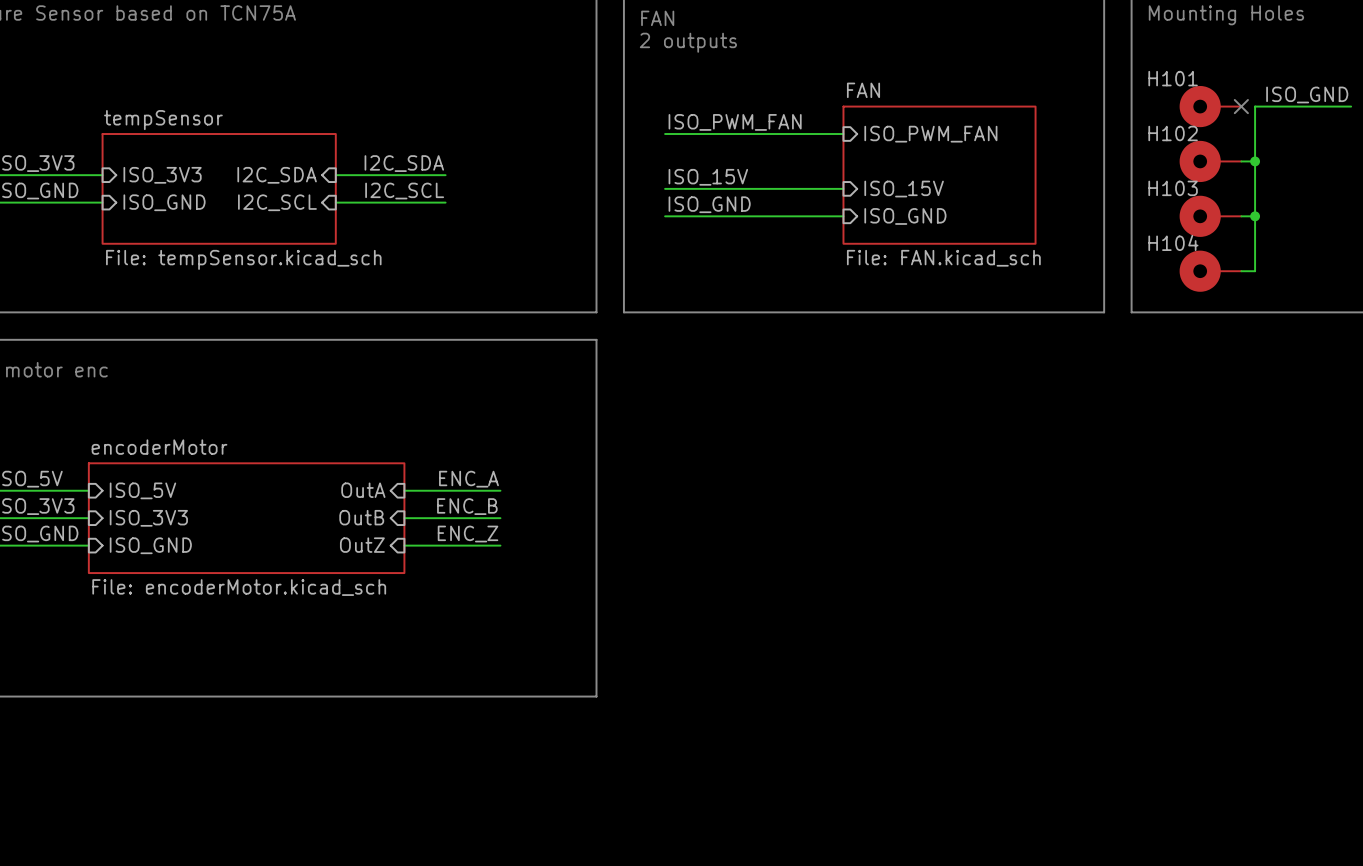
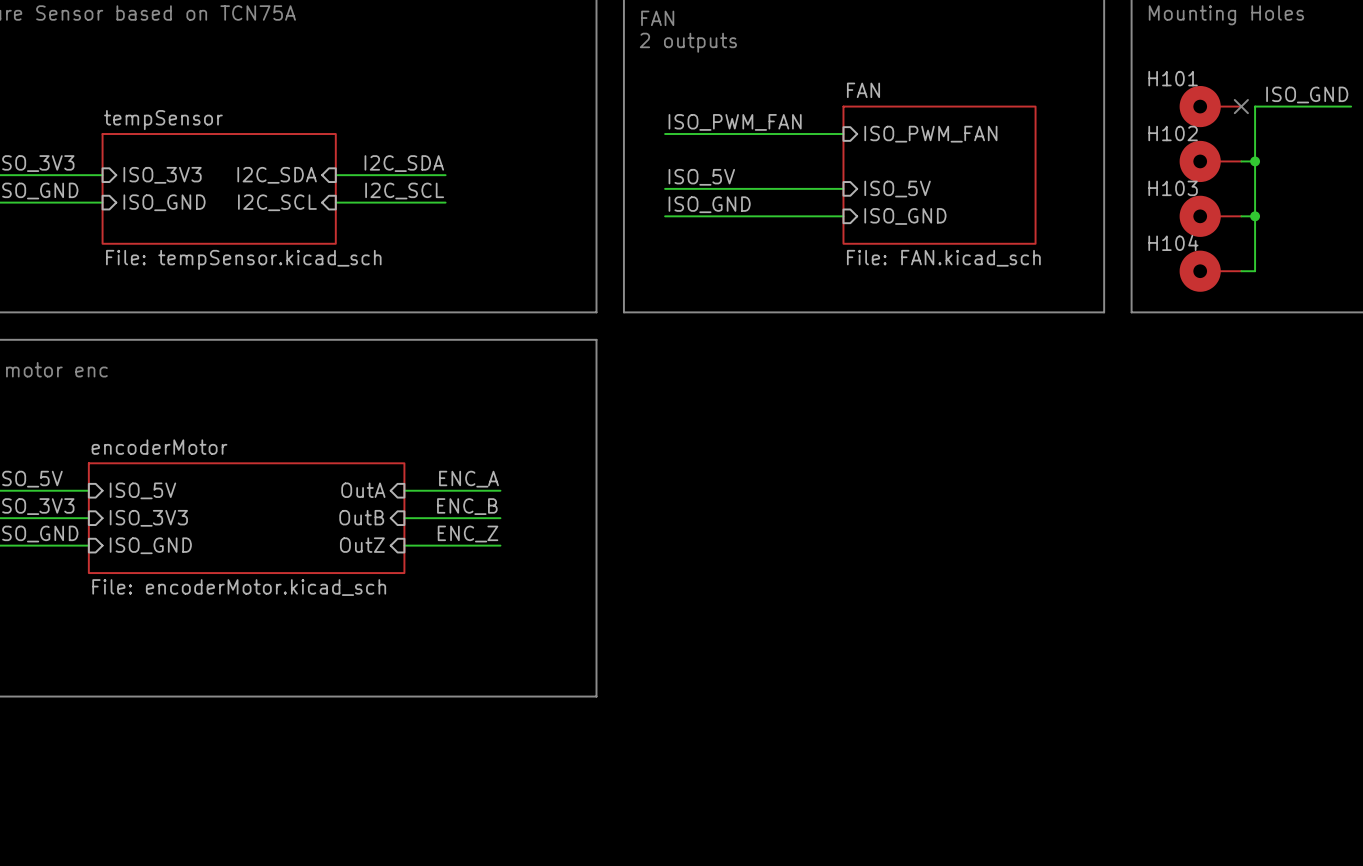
label: ISO_15V (708, 177) -> ISO_5V (701, 177)
sheet pin: ISO_15V (904, 189) -> ISO_5V (897, 189)

